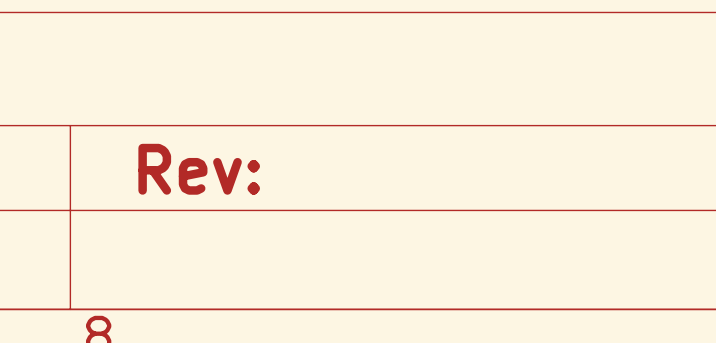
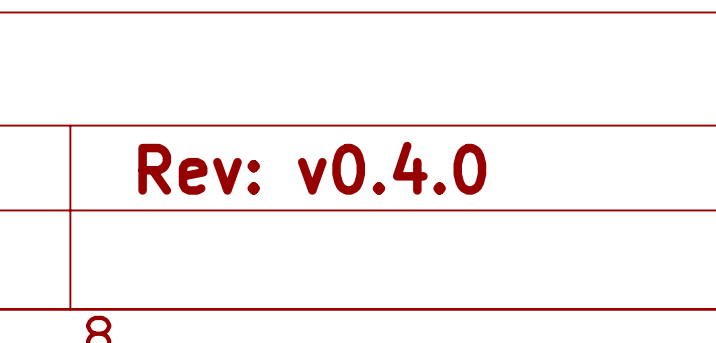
title block: Rev: (199, 169) -> Rev: v0.4.0 (312, 168)

